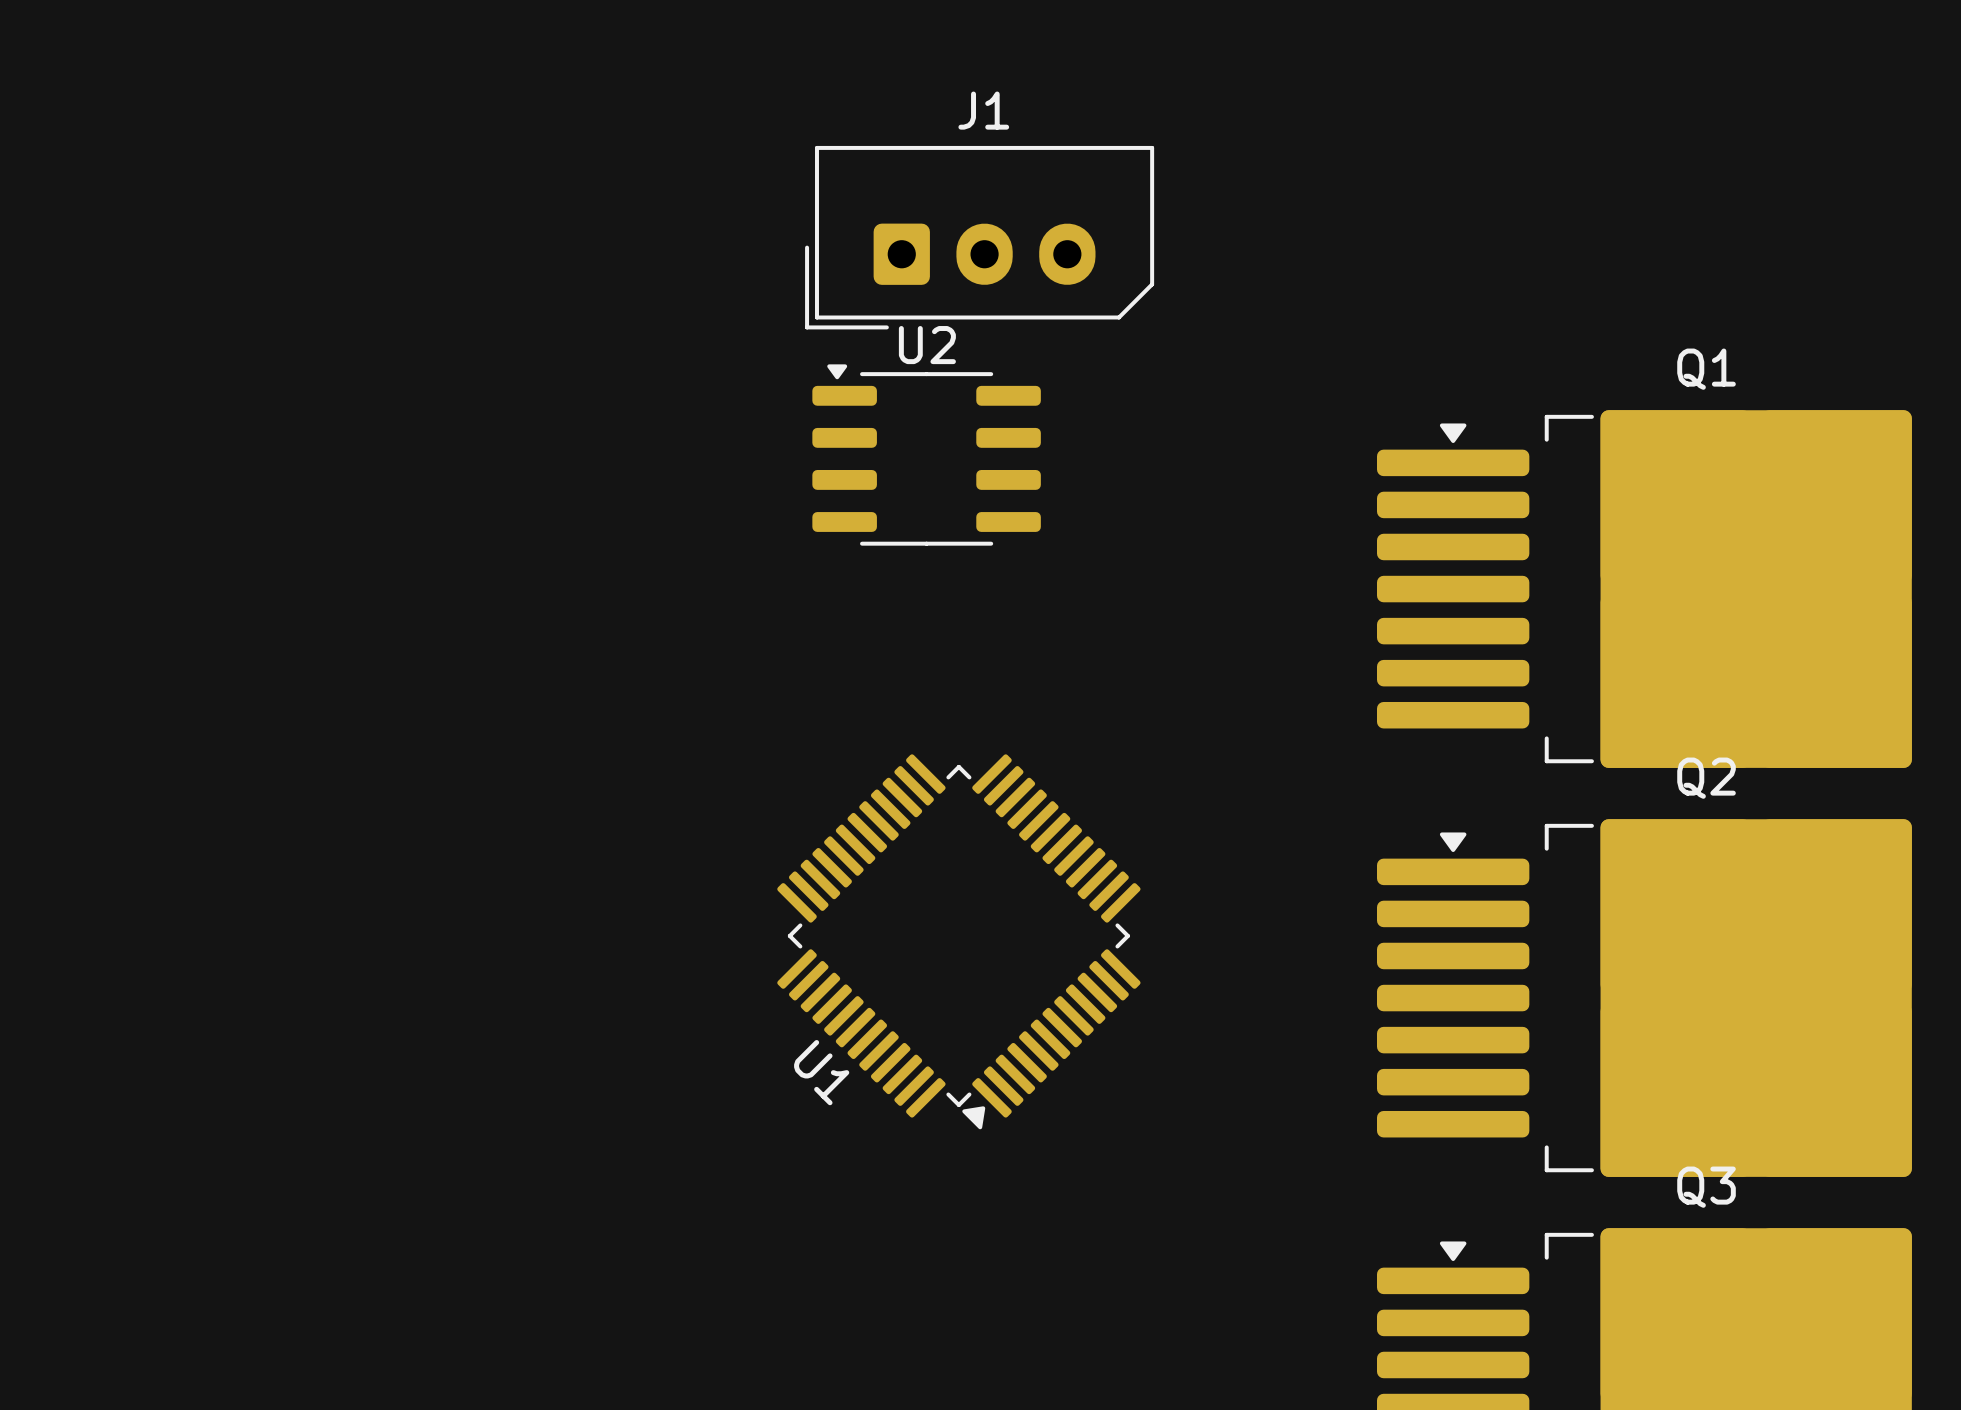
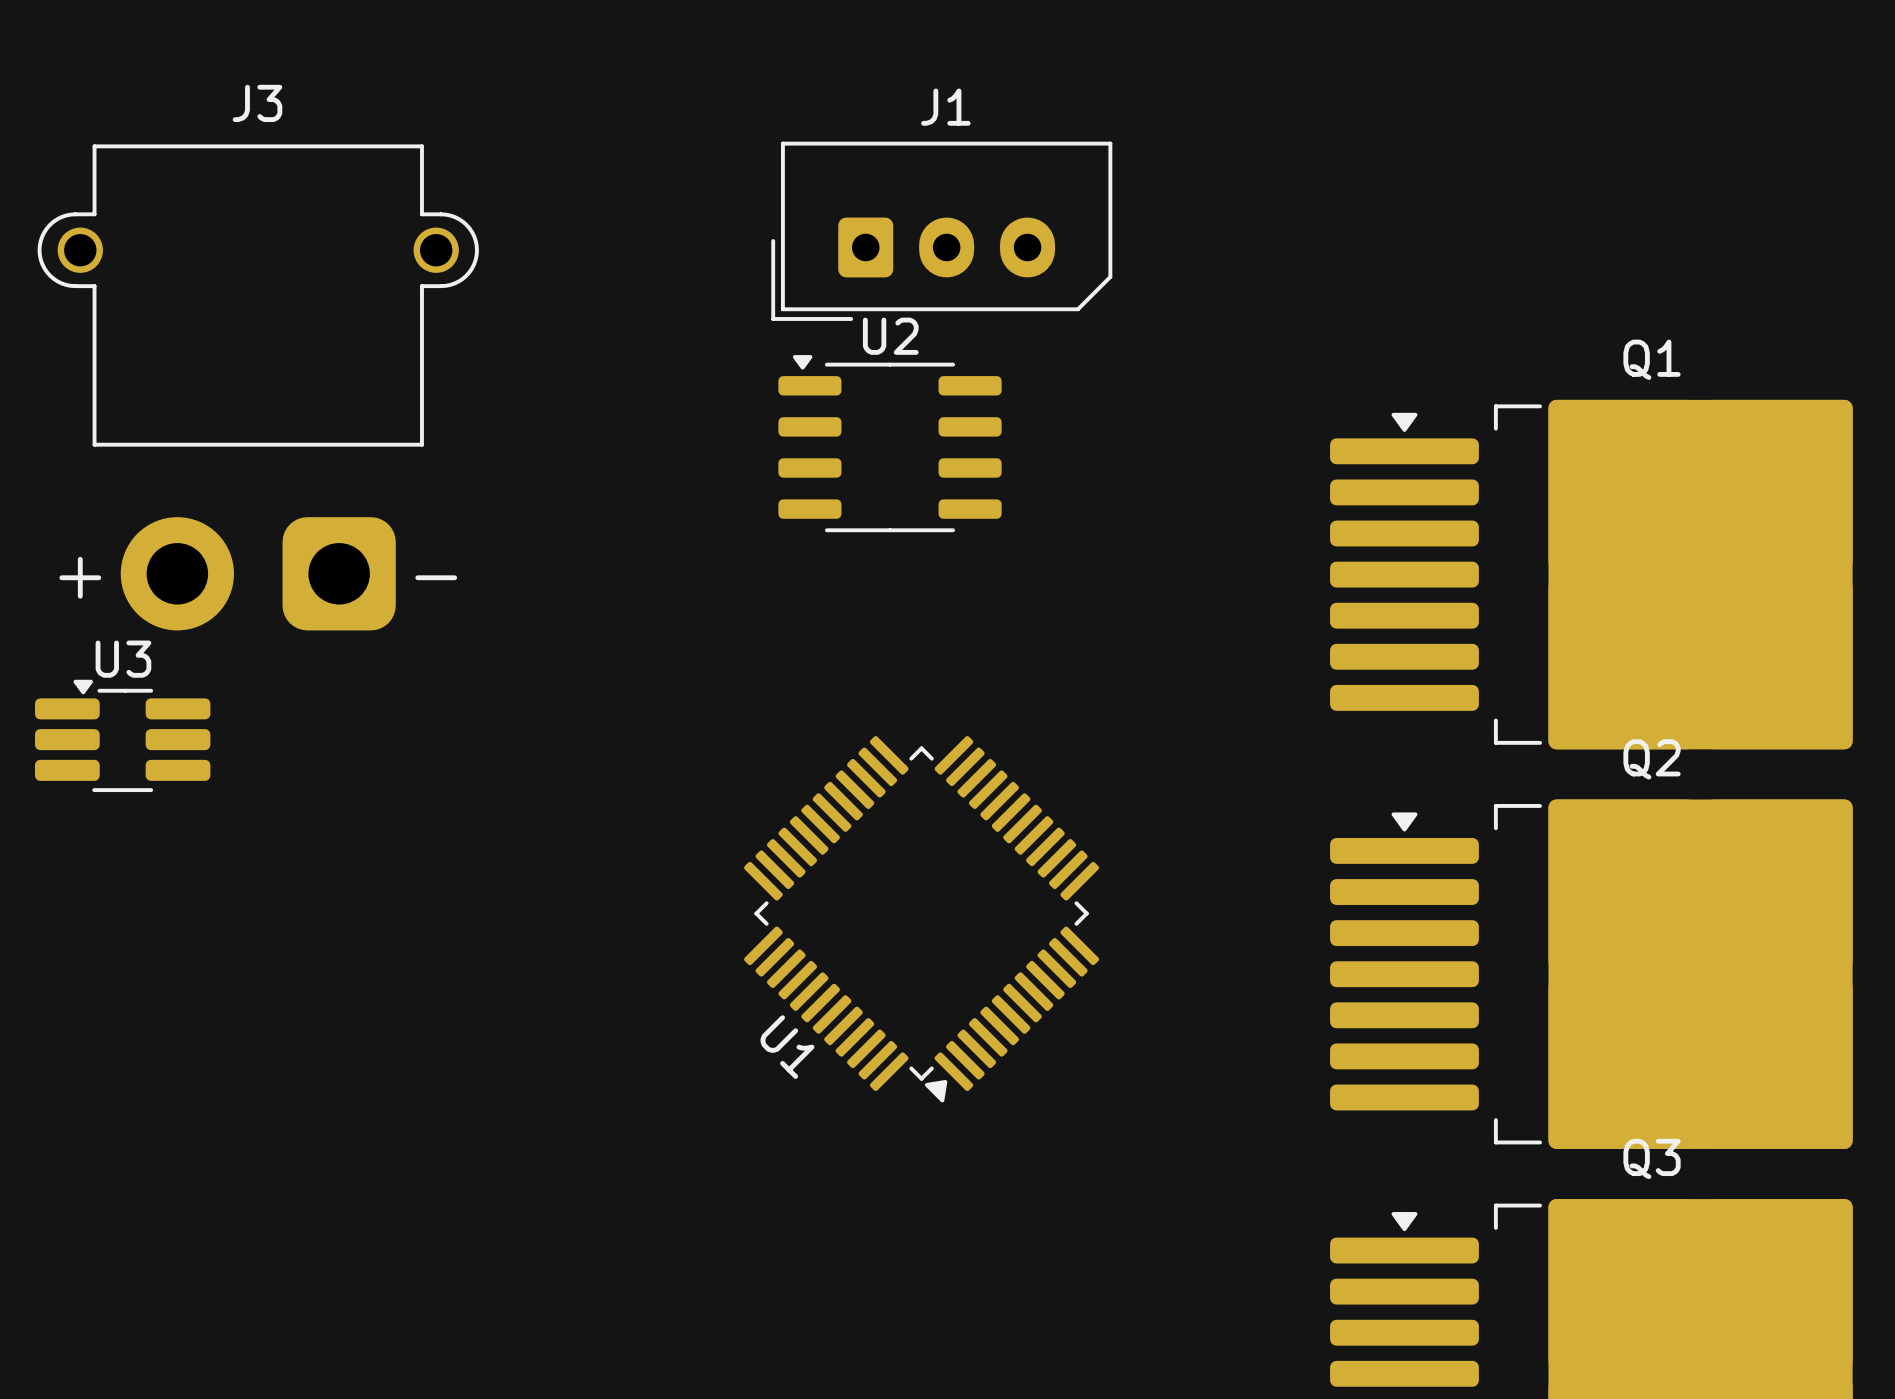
J3: none -> (258, 387)
U3: none -> (122, 735)

